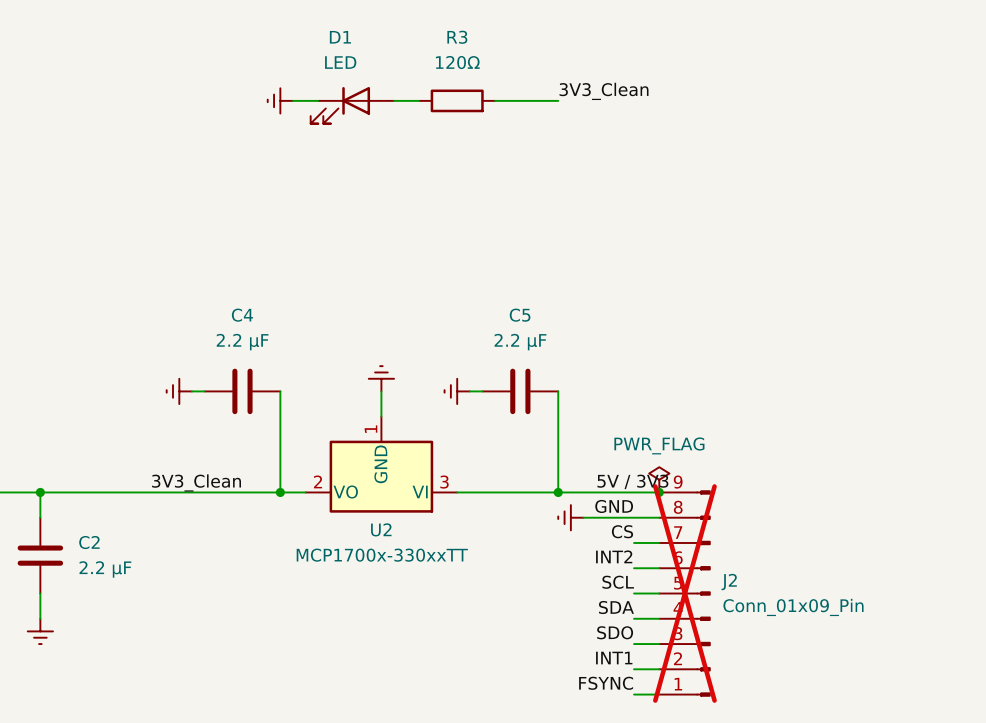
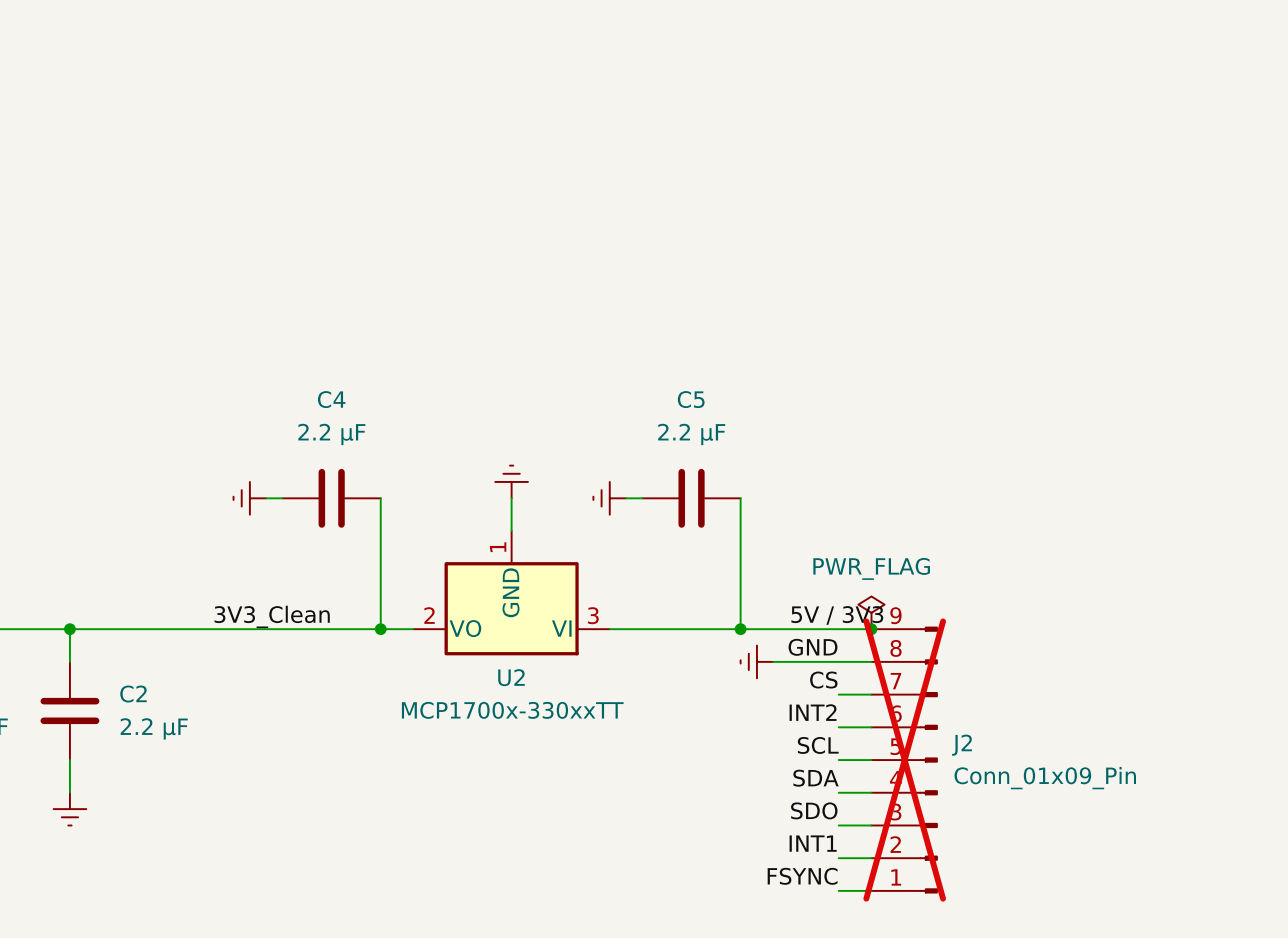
label: 3V3_Clean (604, 91) -> none
power symbol: (280, 100) -> none
wire: (292, 100) (318, 100) -> none
wire: (394, 100) (419, 100) -> none
R3: 120Ω (457, 100) -> none
wire: (495, 100) (558, 100) -> none
D1: LED (352, 105) -> none

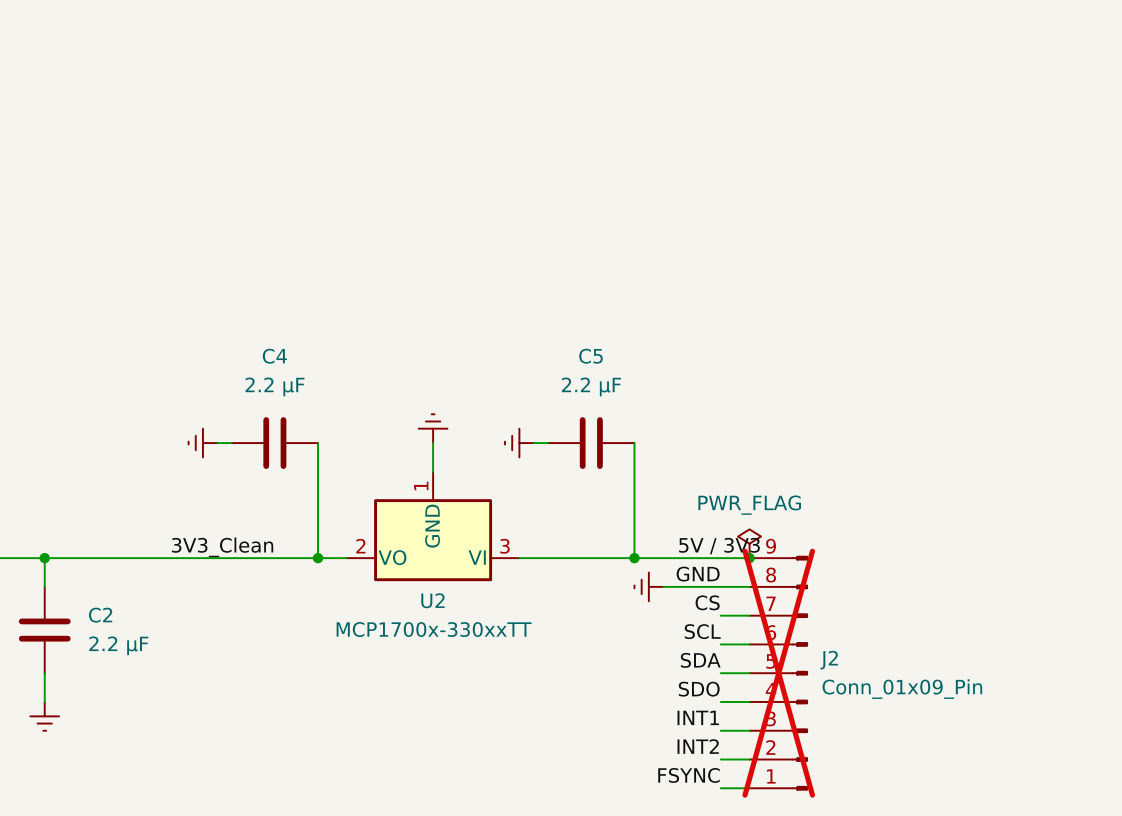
label: INT2 (813, 712) -> SCL (702, 631)
label: SCL (818, 745) -> SDA (700, 660)
label: SDA (815, 778) -> SDO (699, 689)
label: SDO (814, 810) -> INT1 (698, 717)
label: INT1 (813, 843) -> INT2 (698, 746)

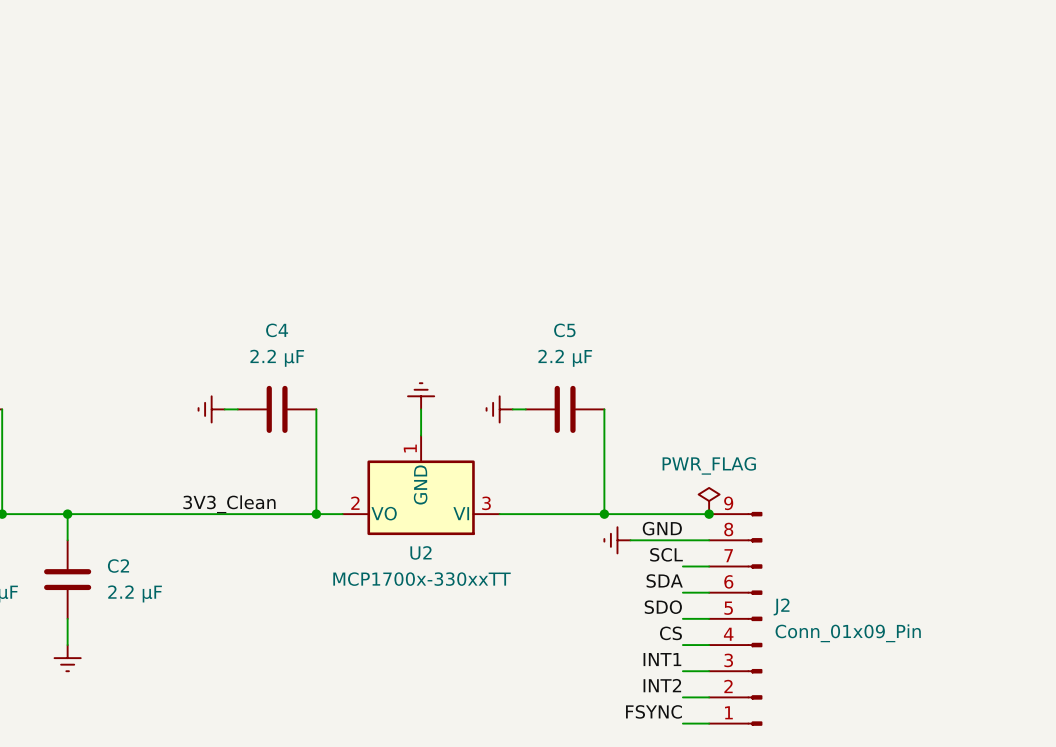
label: 5V / 3V3 (719, 546) -> none
label: CS (707, 602) -> SCL (666, 554)
label: SCL (702, 631) -> SDA (664, 581)
label: SDA (700, 660) -> SDO (663, 607)
J2 do-not-place cross: (778, 673) -> none
label: SDO (699, 689) -> CS (670, 633)

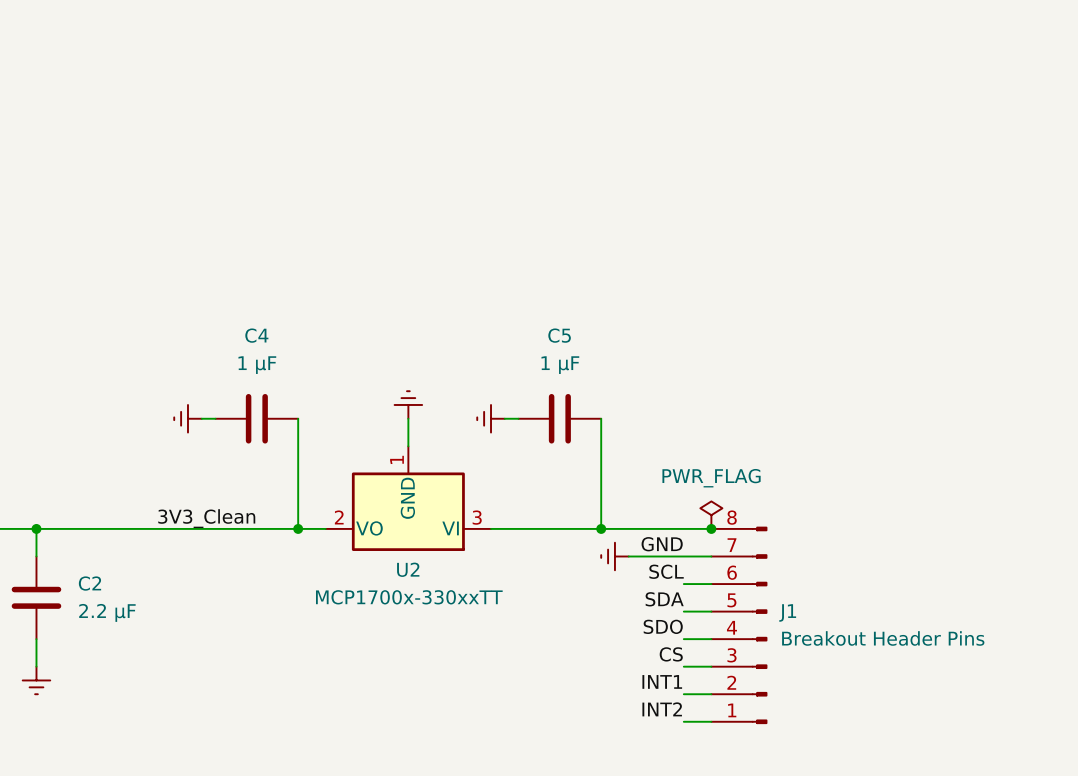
C4 value: 2.2 µF (277, 358) -> 1 µF (257, 365)
C5 value: 2.2 µF (565, 358) -> 1 µF (560, 365)
J1: none -> Breakout Header Pins (739, 625)
J2: Conn_01x09_Pin (735, 618) -> none
label: FSYNC (653, 711) -> none
wire: (682, 723) (709, 723) -> none

